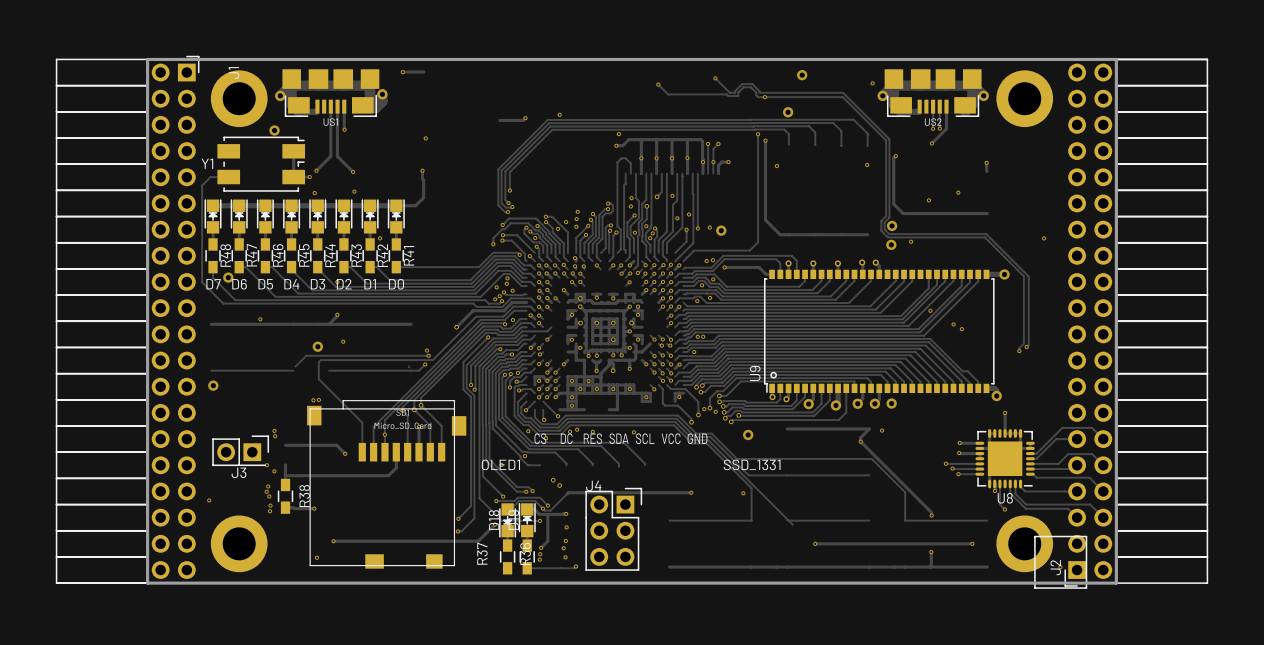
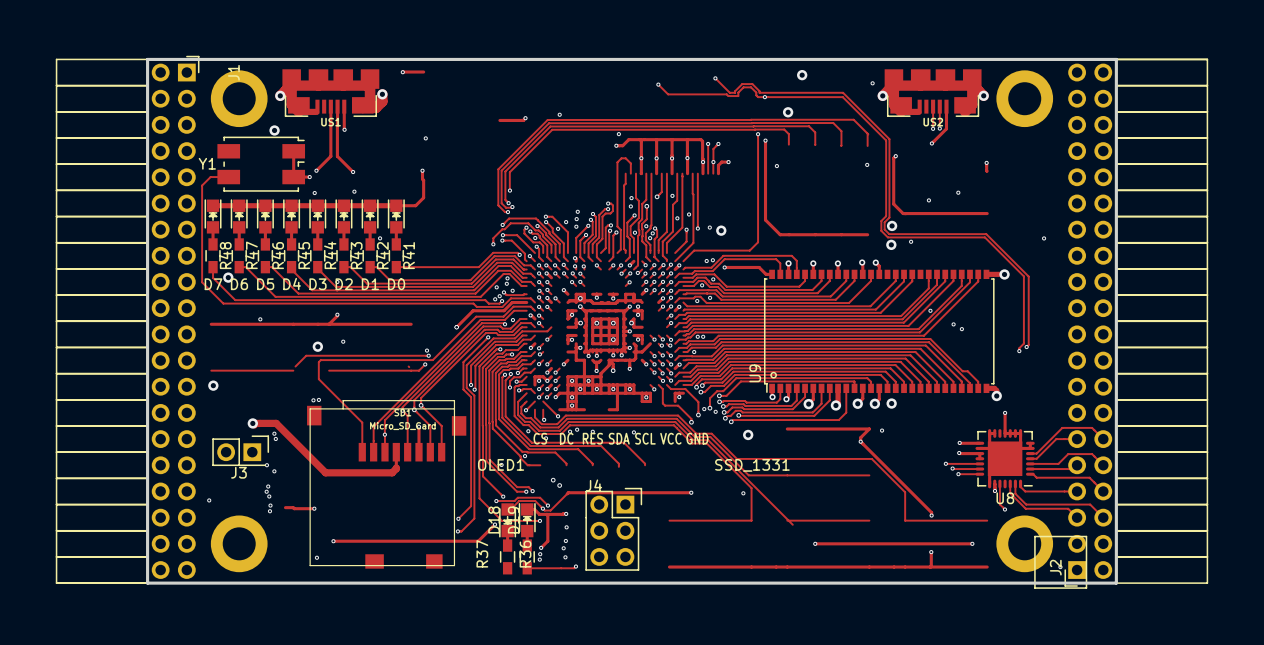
via: none -> (252, 423)
via: (274, 430) -> none
via: none -> (274, 433)
via: (275, 436) -> none
via: none -> (275, 438)
track: (285, 445) (336, 445) (345, 453) -> none
via: (345, 453) -> none
track: (285, 464) (285, 484) -> none
track: (396, 467) (388, 475) (285, 475) -> (396, 467) (392, 472) (325, 472) (276, 423) (252, 423) (254, 426)
R38: (285, 496) -> none

